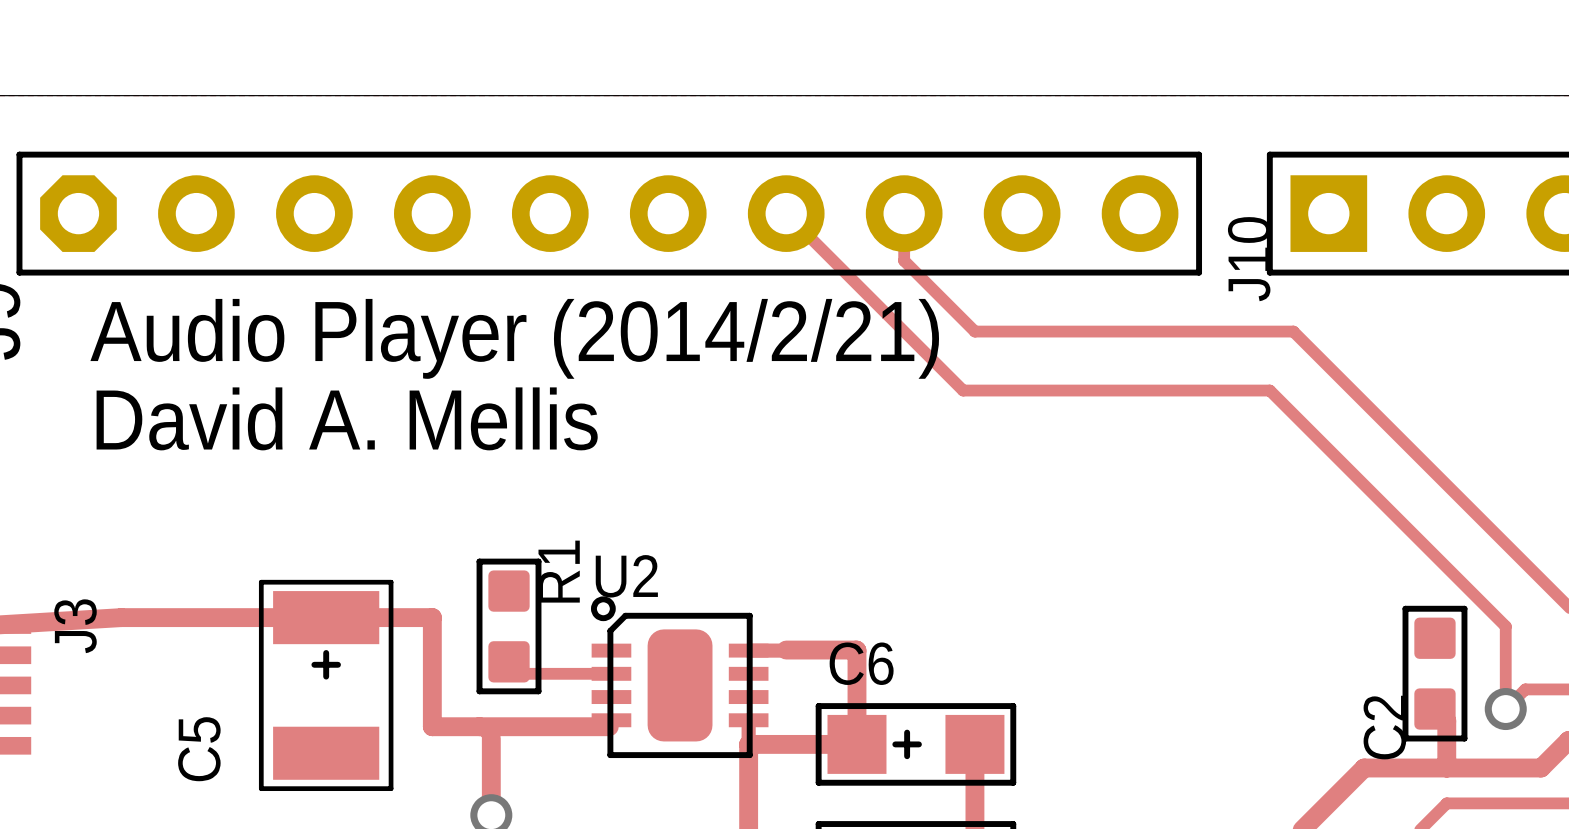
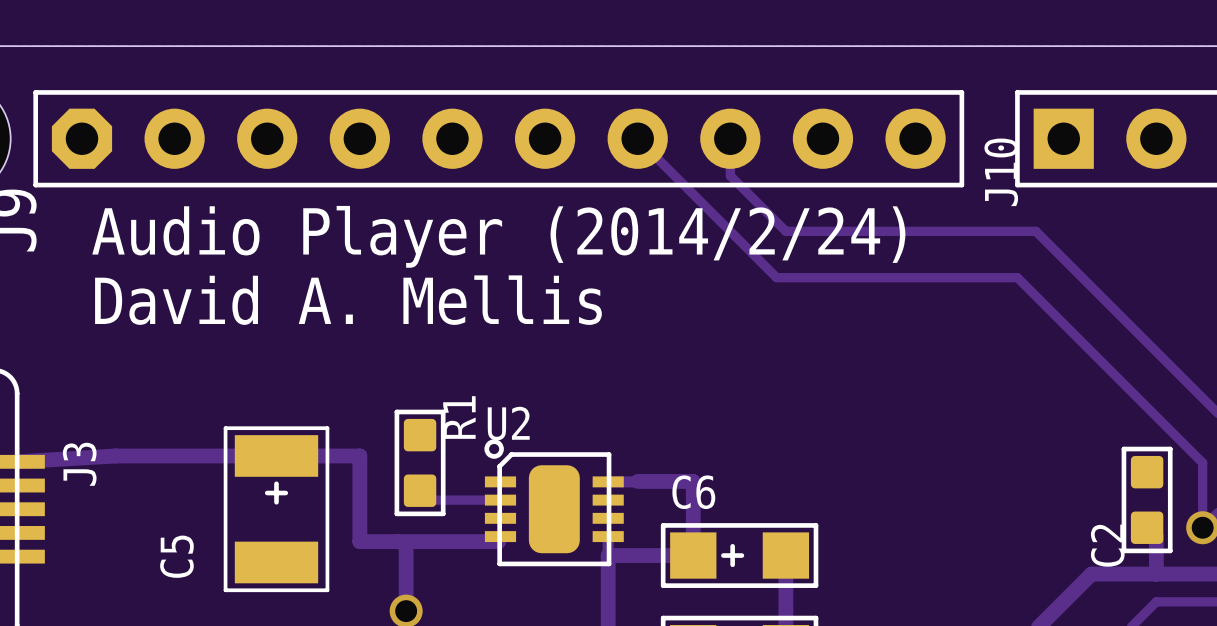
text: Audio Player (2014/2/21) (514, 338) -> Audio Player (2014/2/24) (498, 236)

